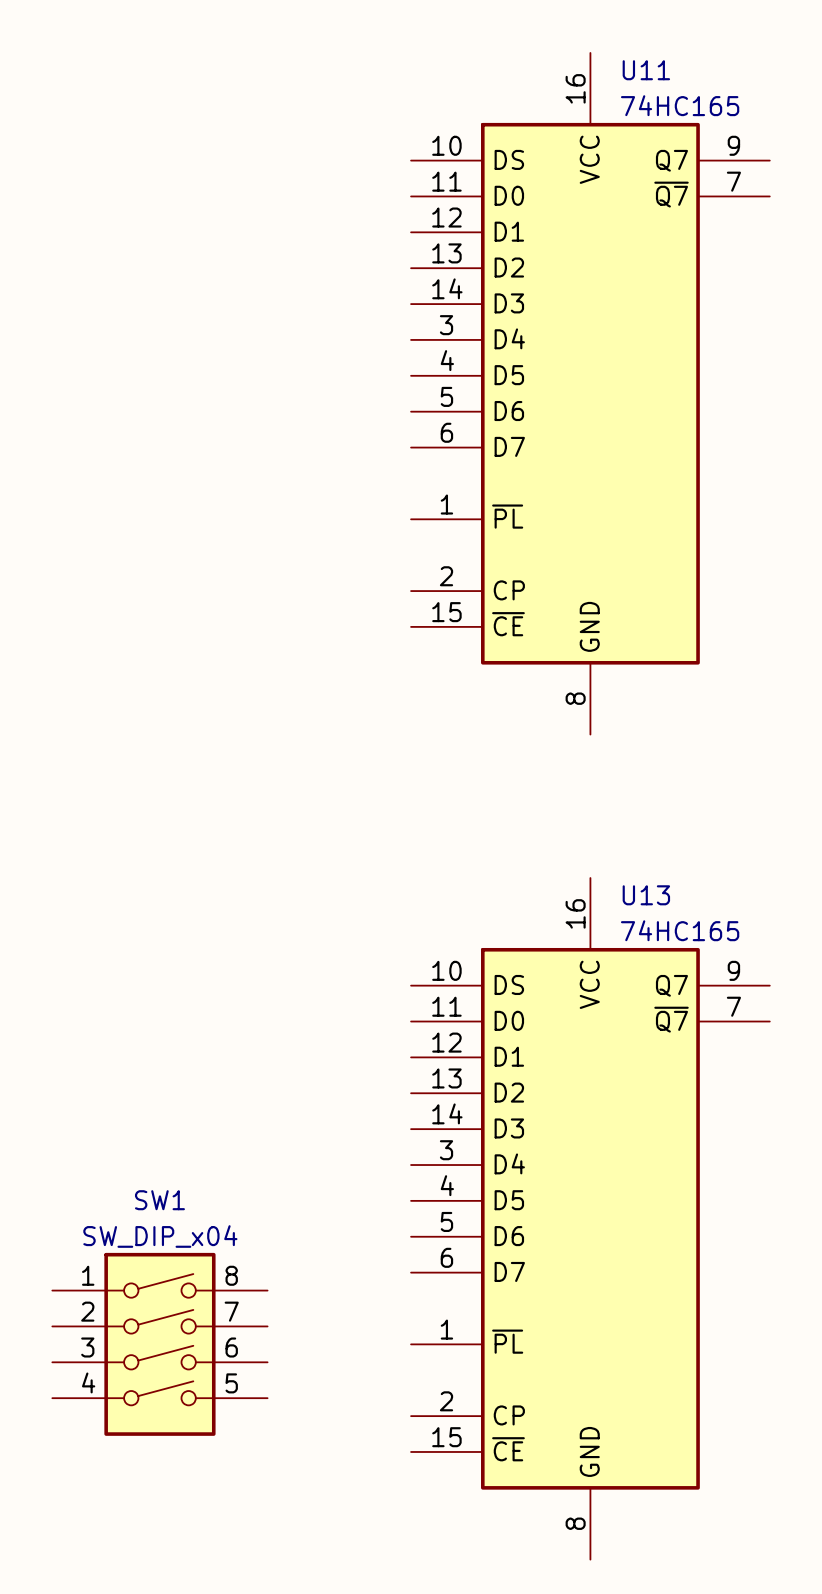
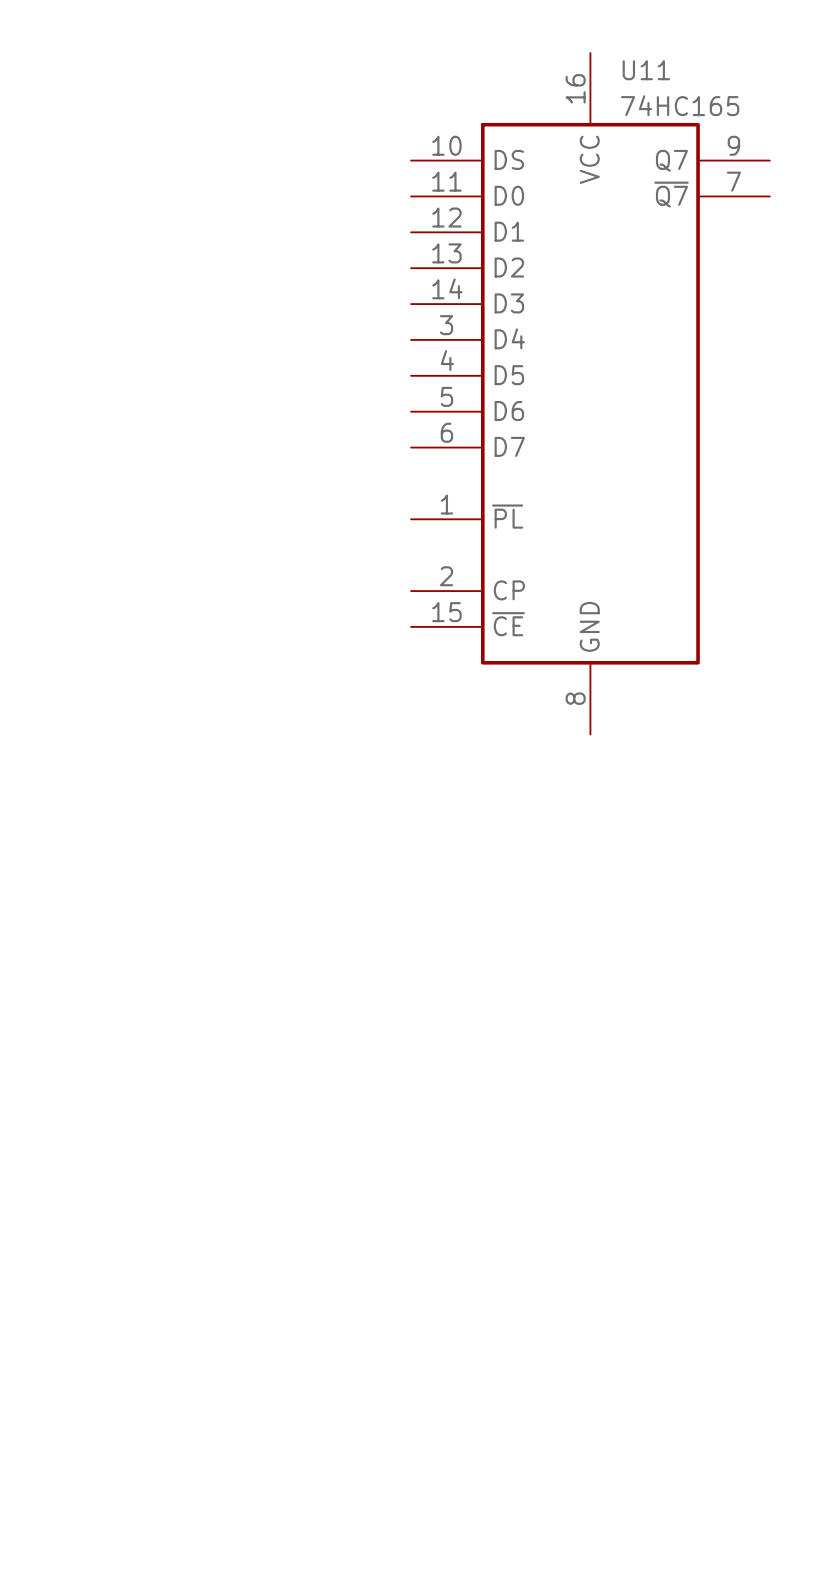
U13: 74HC165 (590, 1218) -> none
SW1: SW_DIP_x04 (159, 1344) -> none

